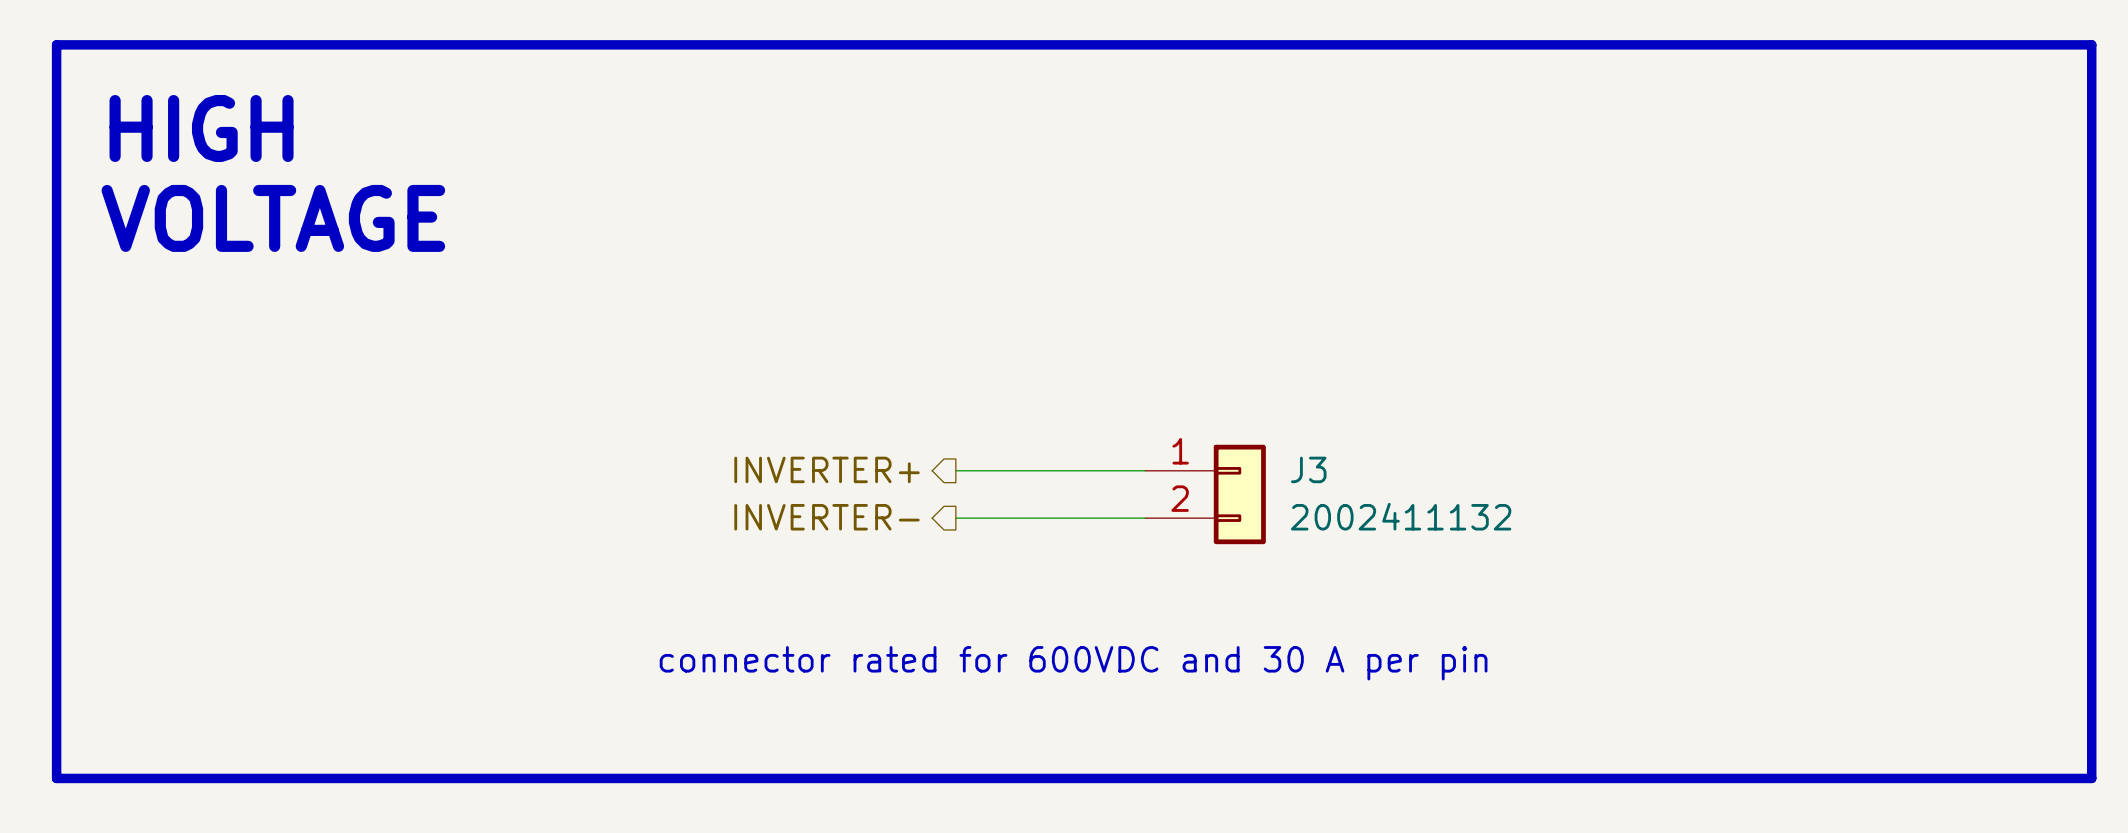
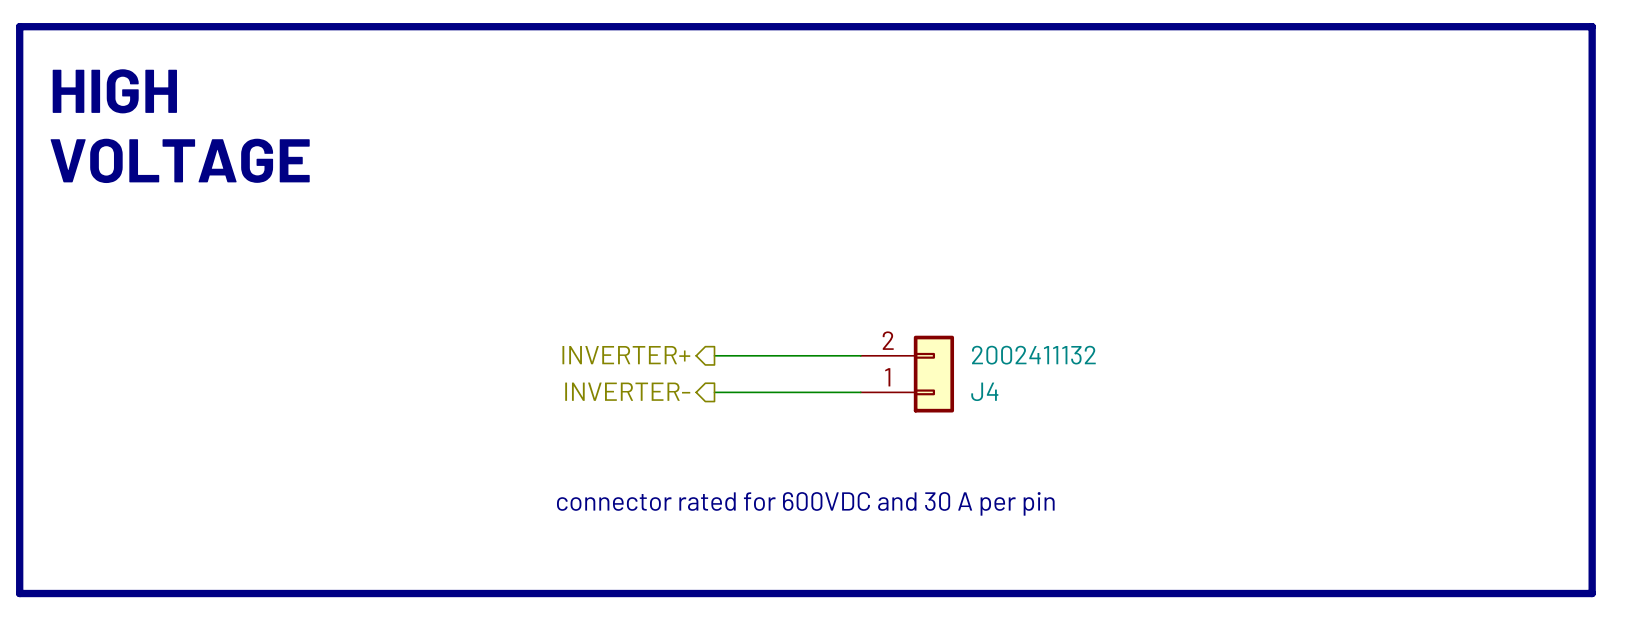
J3 name: J3 (1308, 469) -> J4 (984, 391)
J3 flip: as is (1239, 494) -> up-down (933, 374)

